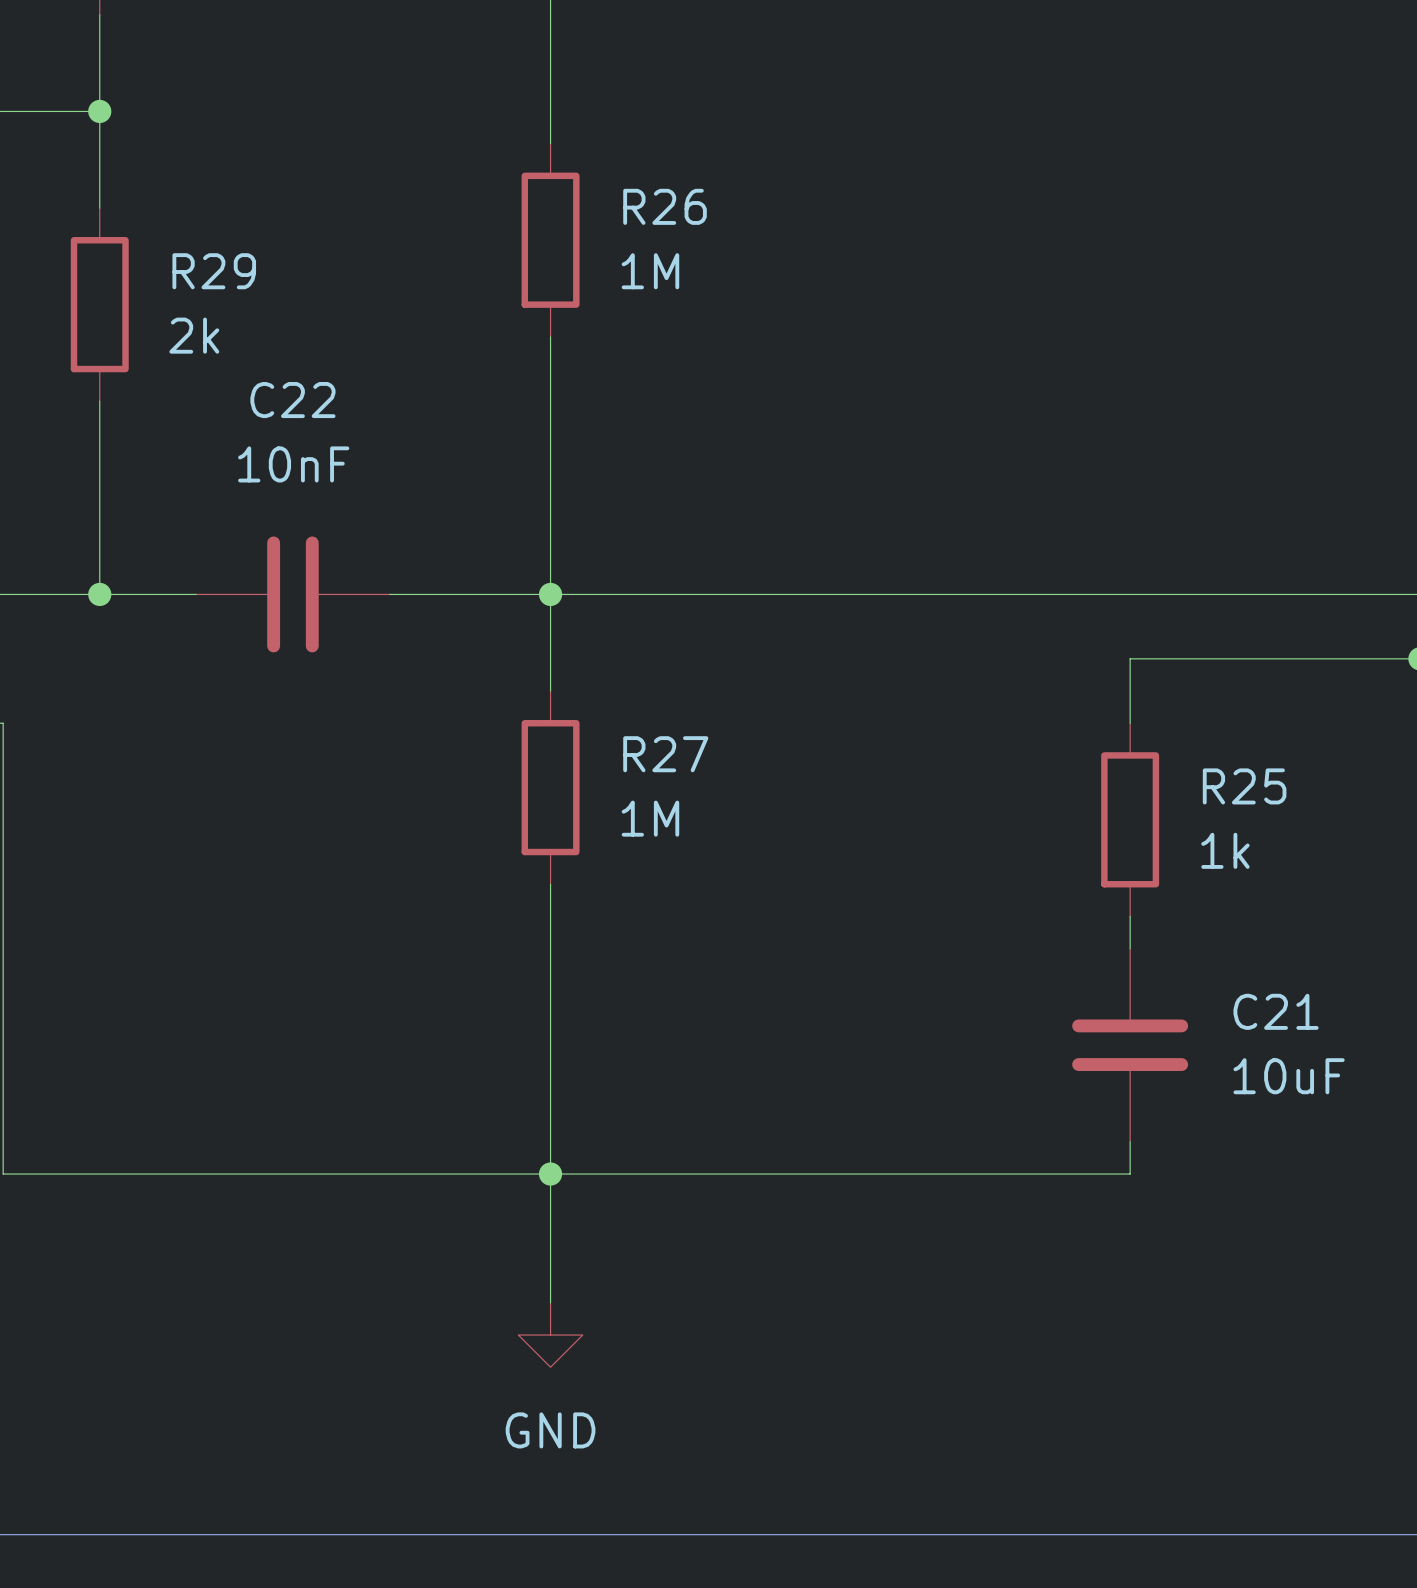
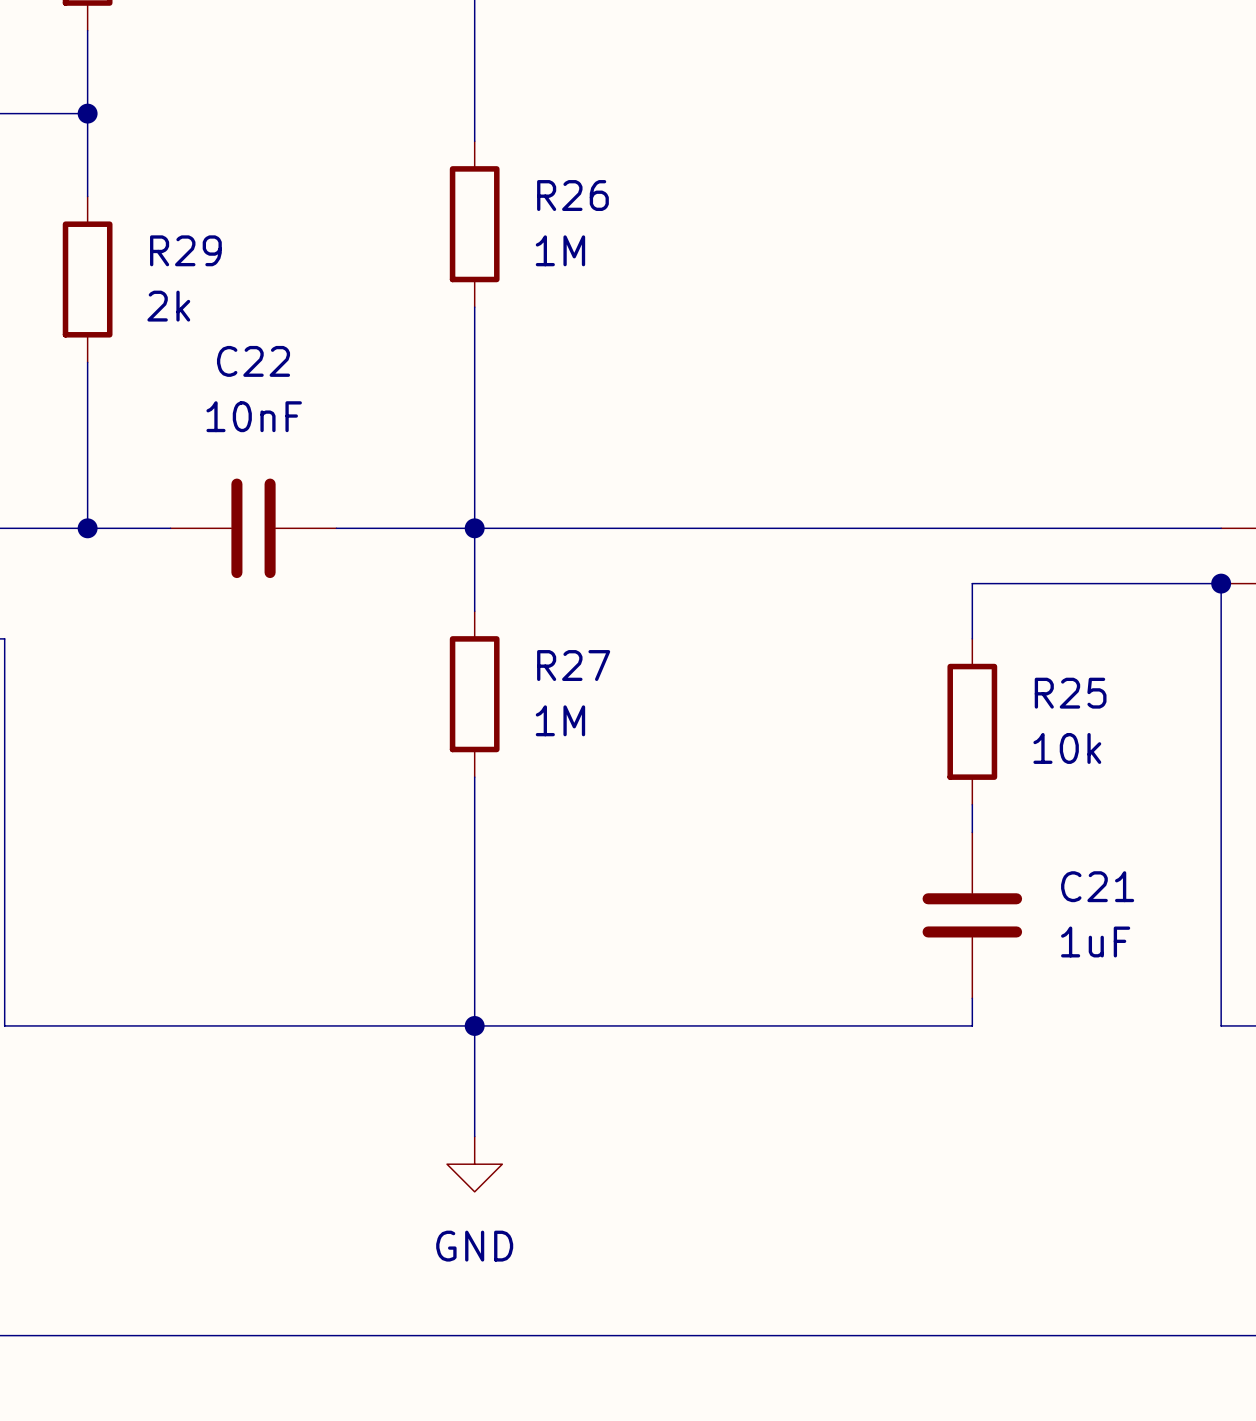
R25 value: 1k (1225, 850) -> 10k (1067, 748)
C21 value: 10uF (1289, 1076) -> 1uF (1095, 941)

